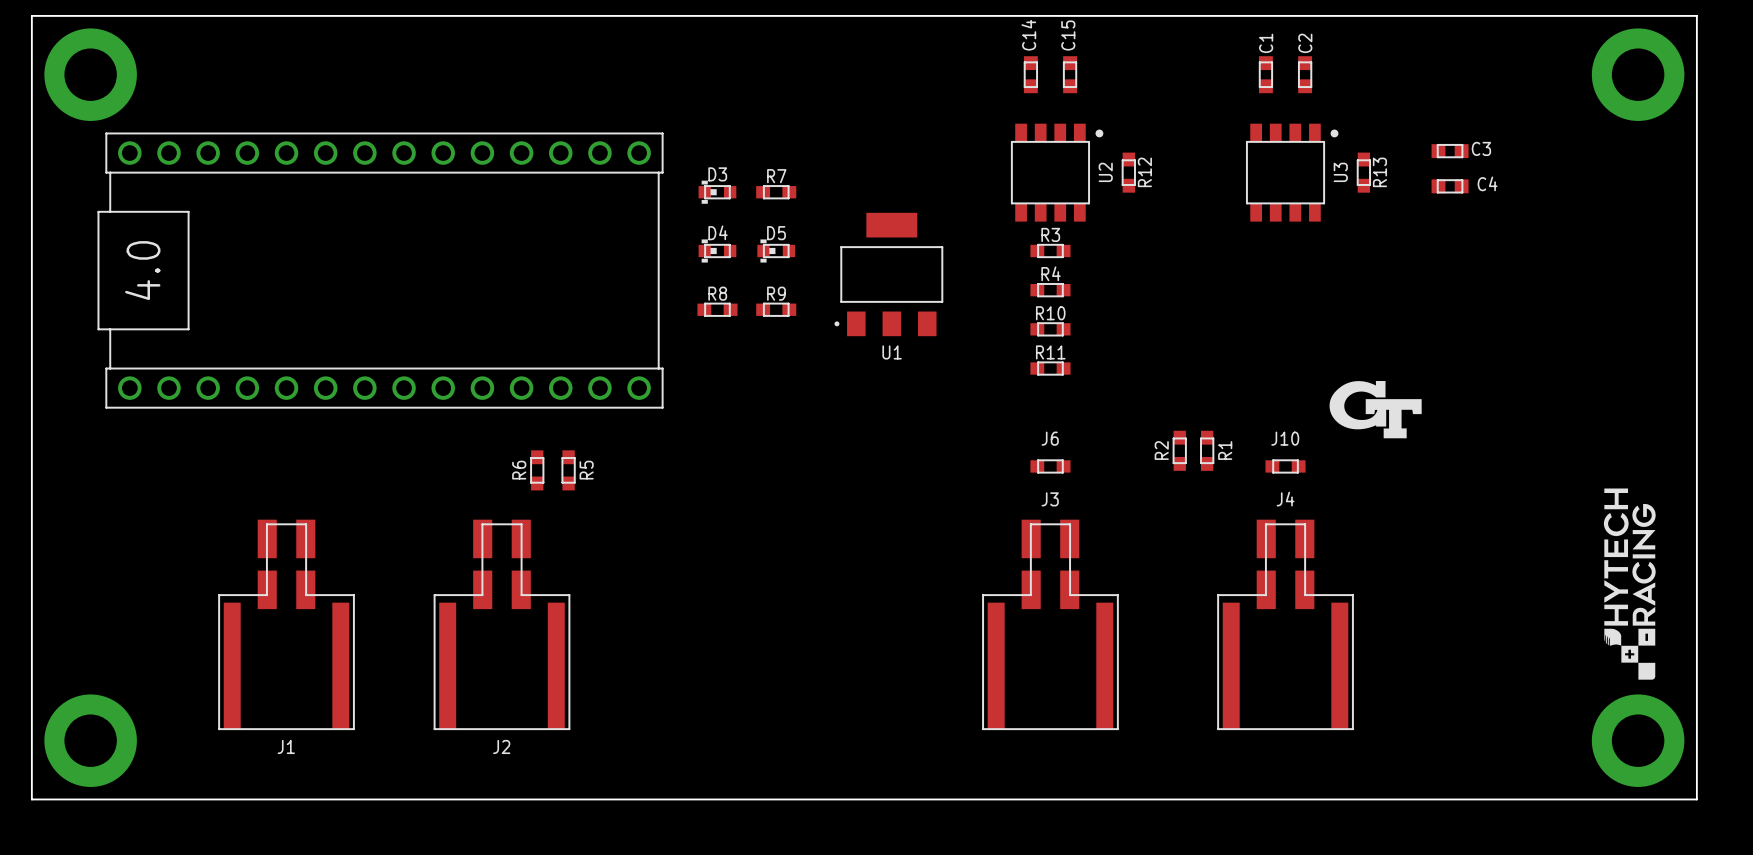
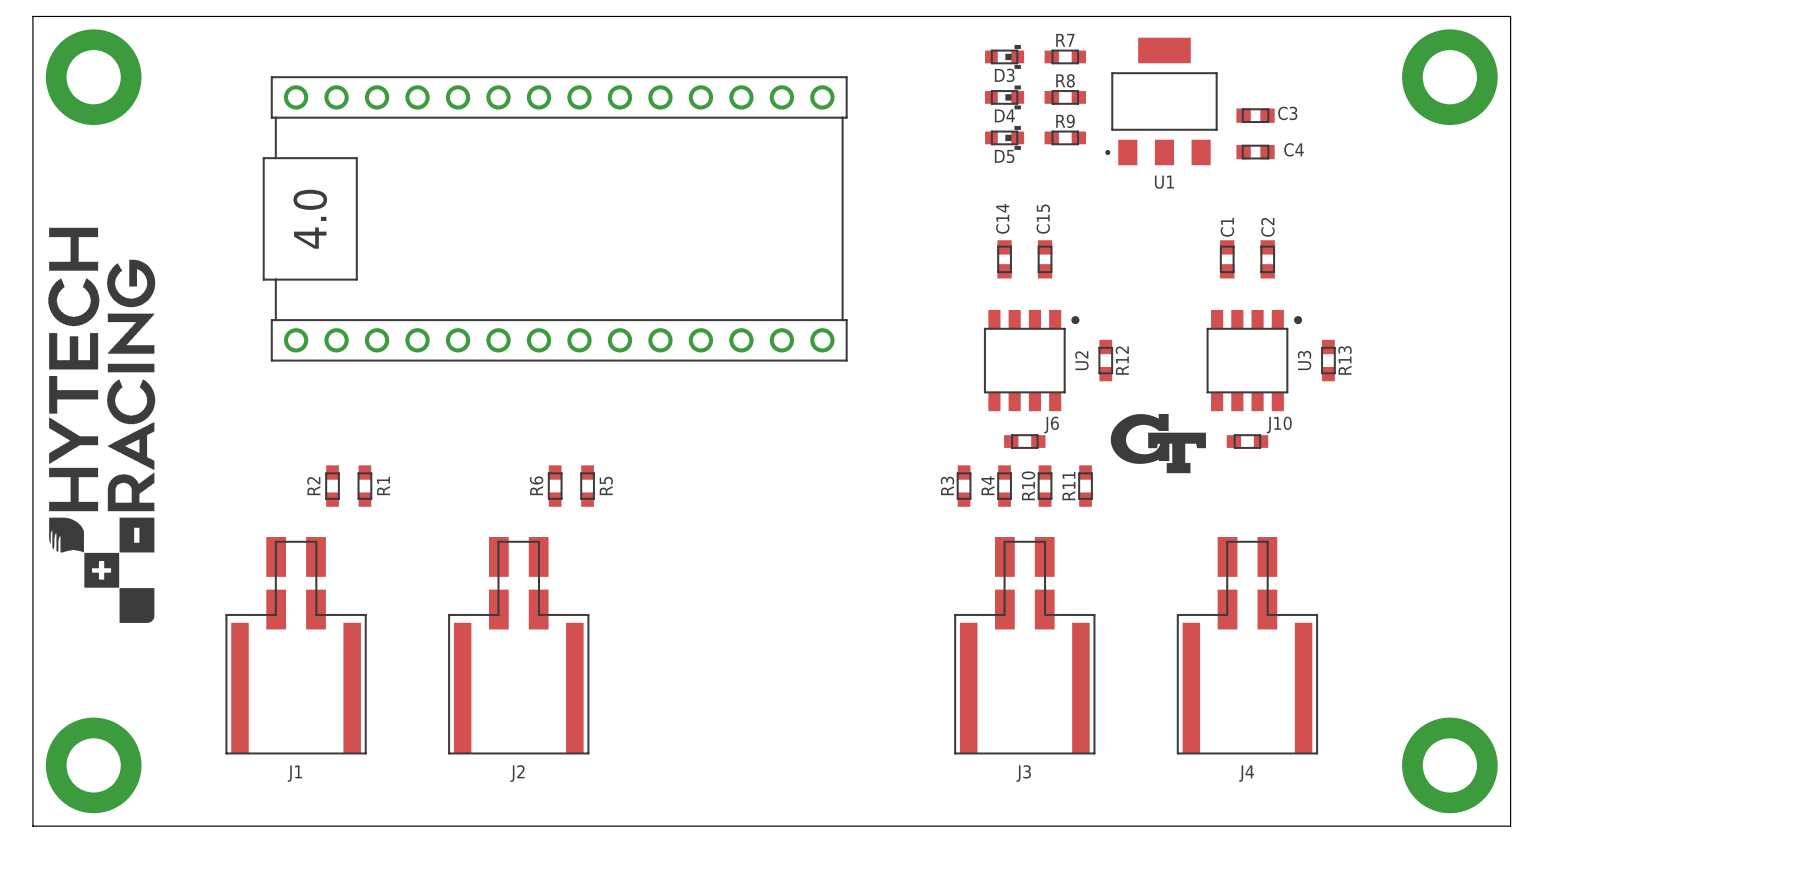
board edge: (1461, 15) (1696, 15) (1696, 799) (1461, 799) -> (1510, 16) (1510, 826)
C14 position: (1030, 74) -> (1004, 259)
C15 position: (1070, 74) -> (1045, 259)
C1 position: (1265, 74) -> (1227, 259)
C2 position: (1305, 74) -> (1267, 259)
part position: (1638, 74) -> (1449, 77)
C3 position: (1450, 151) -> (1255, 115)
U2 position: (1057, 172) -> (1031, 360)
R12 position: (1128, 172) -> (1105, 360)
U3 position: (1292, 172) -> (1254, 360)
R13 position: (1363, 172) -> (1328, 360)
C4 position: (1450, 186) -> (1255, 152)
D3 rotation: 0° (717, 192) -> 180° (1004, 56)
D3 position: (717, 192) -> (1004, 56)
R7 position: (776, 192) -> (1065, 56)
drawing: none -> [48, 227, 156, 623]
D4 rotation: 0° (717, 250) -> 180° (1004, 97)
D4 position: (717, 250) -> (1004, 97)
D5 rotation: 0° (776, 250) -> 180° (1004, 137)
D5 position: (776, 250) -> (1004, 137)
R3 rotation: 0° (1050, 250) -> 90° clockwise (964, 486)
R3 position: (1050, 250) -> (964, 486)
part position: (380, 270) -> (555, 218)
U1 position: (888, 274) -> (1161, 101)
R4 rotation: 0° (1050, 290) -> 90° clockwise (1004, 486)
R4 position: (1050, 290) -> (1004, 486)
R8 position: (717, 309) -> (1065, 97)
R9 position: (776, 309) -> (1065, 137)
R10 rotation: 0° (1050, 329) -> 90° clockwise (1045, 486)
R10 position: (1050, 329) -> (1045, 486)
R11 rotation: 0° (1050, 368) -> 90° clockwise (1085, 486)
R11 position: (1050, 368) -> (1085, 486)
drawing position: (1375, 409) -> (1158, 443)
J6 name position: J6 (1050, 438) -> J6 (1051, 424)
J10 name position: J10 (1285, 438) -> J10 (1279, 424)
R2 position: (1179, 450) -> (332, 486)
R1 position: (1207, 450) -> (364, 486)
J6 position: (1050, 466) -> (1024, 441)
J10 position: (1285, 466) -> (1247, 441)
drawing: [1603, 488, 1656, 680] -> none
J3 name position: J3 (1050, 499) -> J3 (1023, 773)
J4 name position: J4 (1285, 499) -> J4 (1246, 773)
J3 position: (1050, 624) -> (1024, 645)
J4 position: (1285, 624) -> (1247, 645)
part position: (1638, 740) -> (1449, 765)

